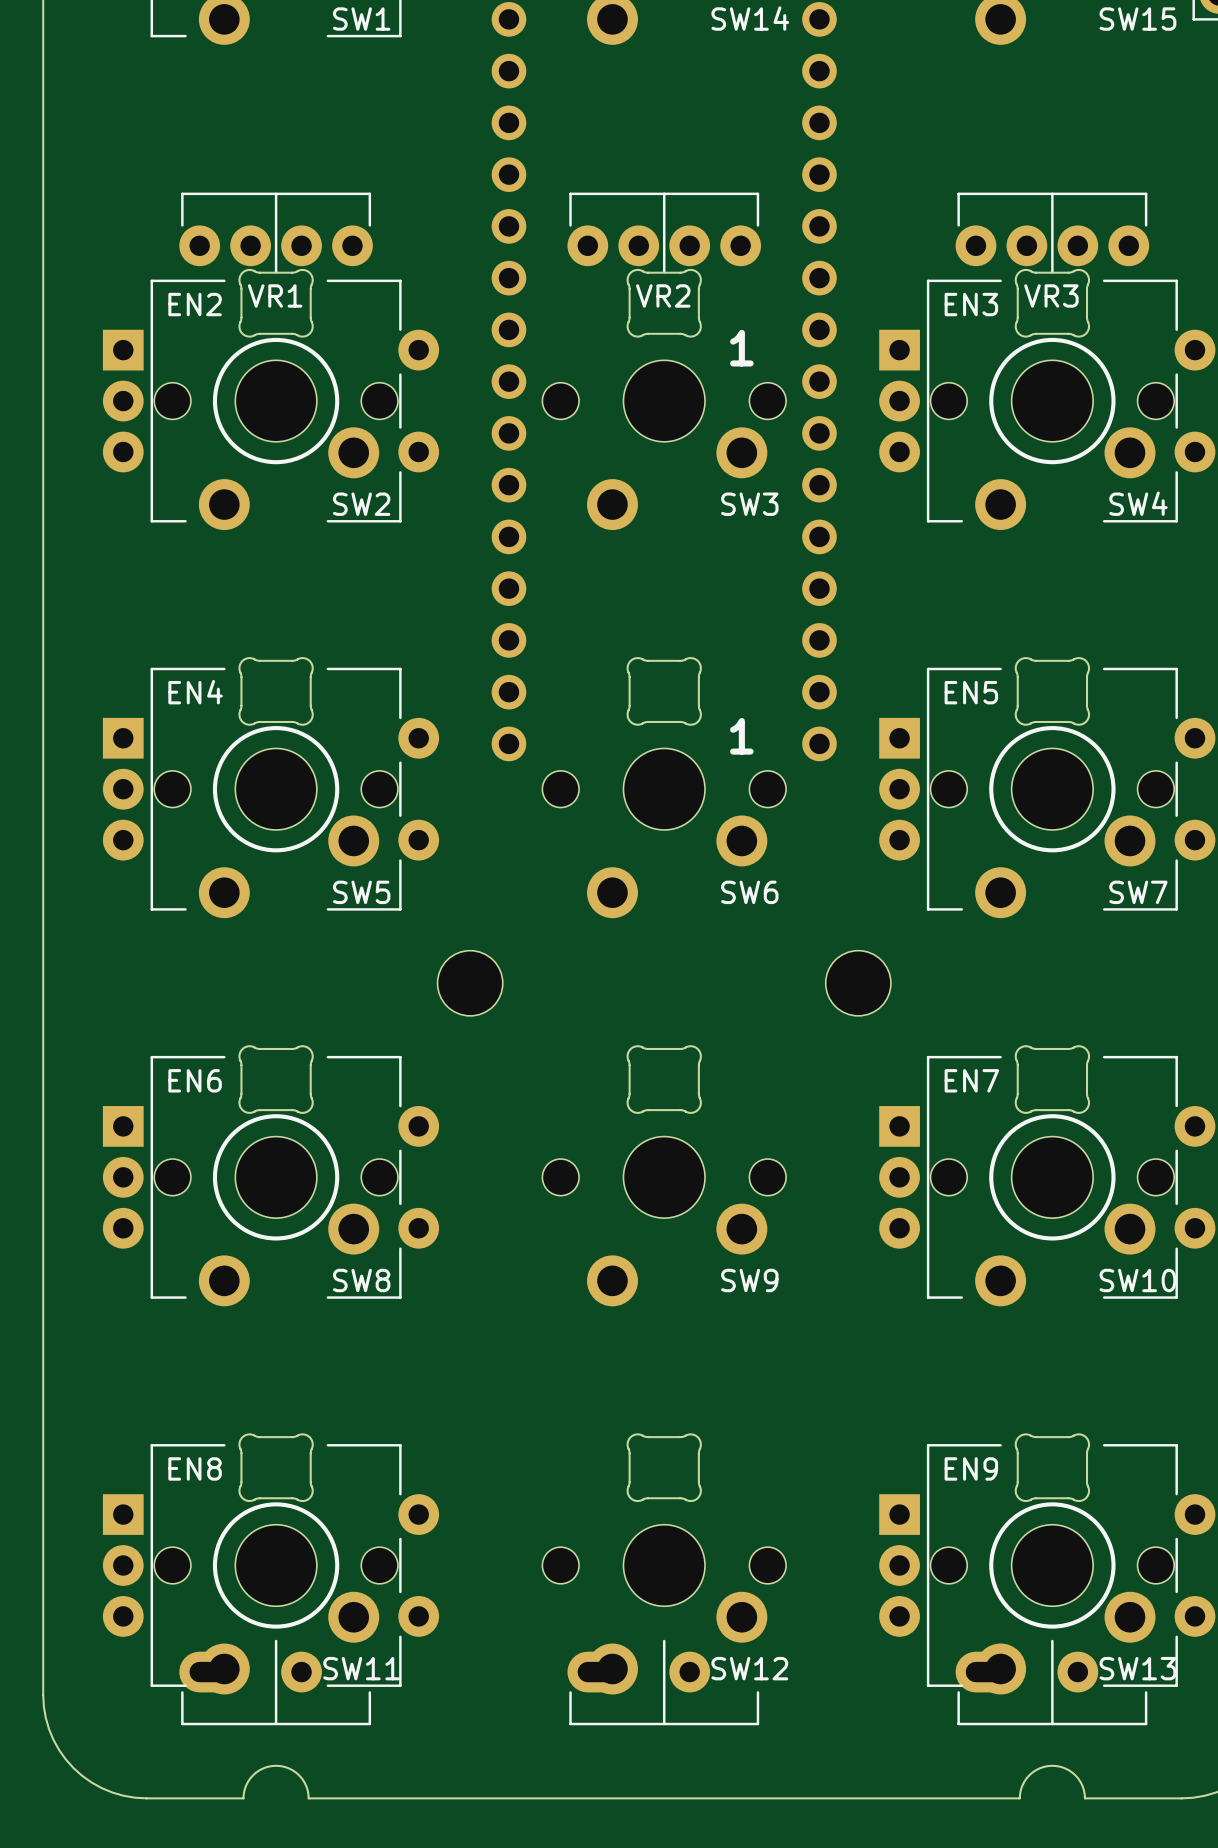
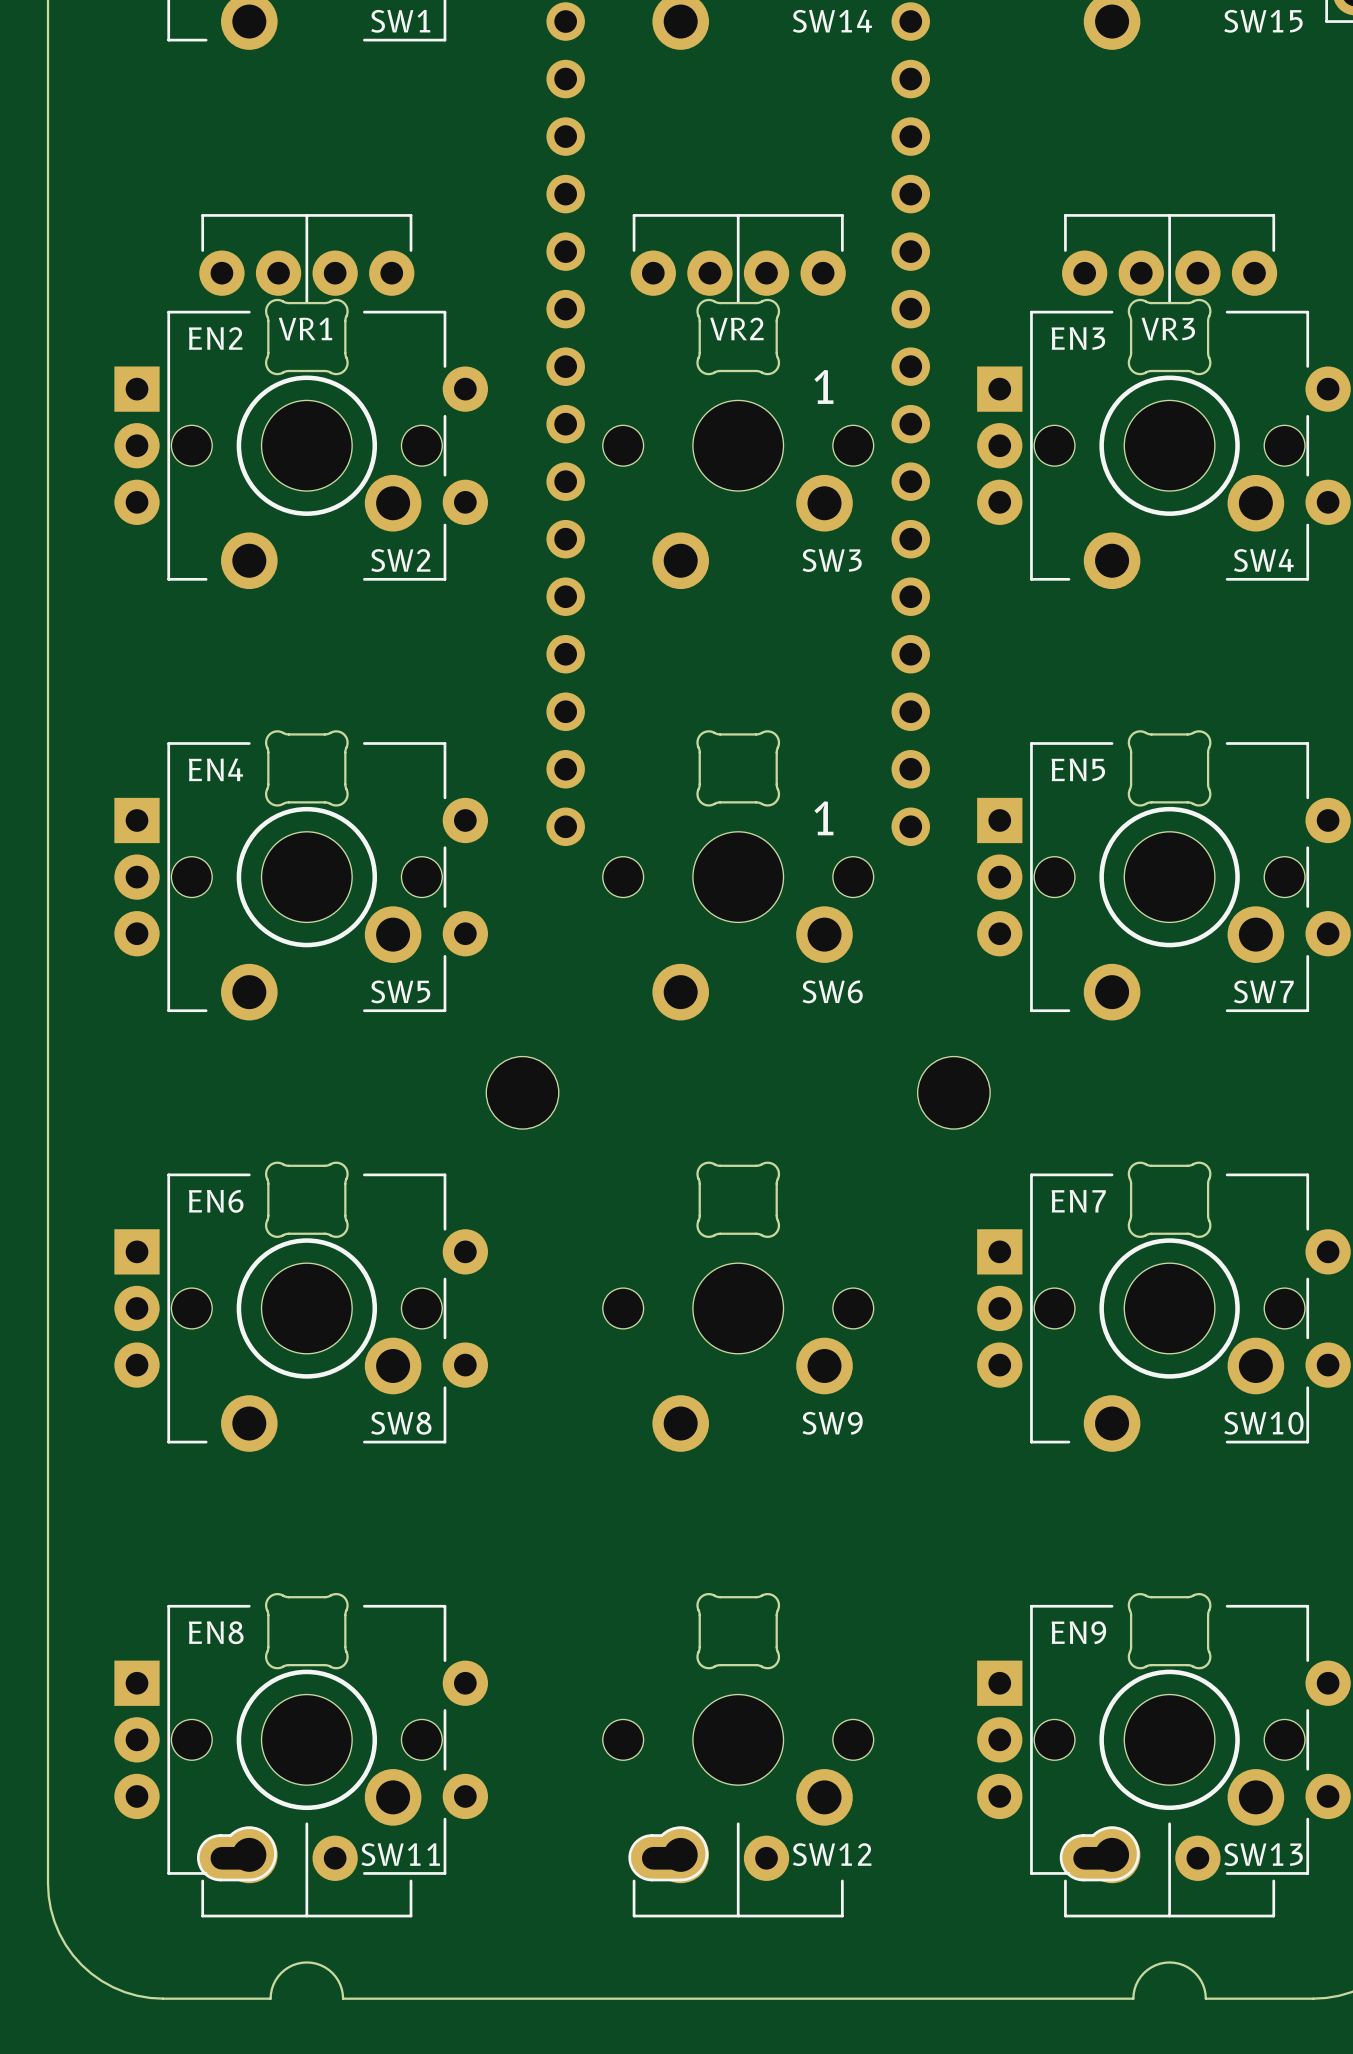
SW11 footprint: [154, 1524, 398, 1695] -> [171, 1694, 443, 1884]
SW12 footprint: [542, 1524, 787, 1695] -> [602, 1694, 874, 1884]
SW13 footprint: [930, 1524, 1175, 1695] -> [1034, 1694, 1306, 1884]

